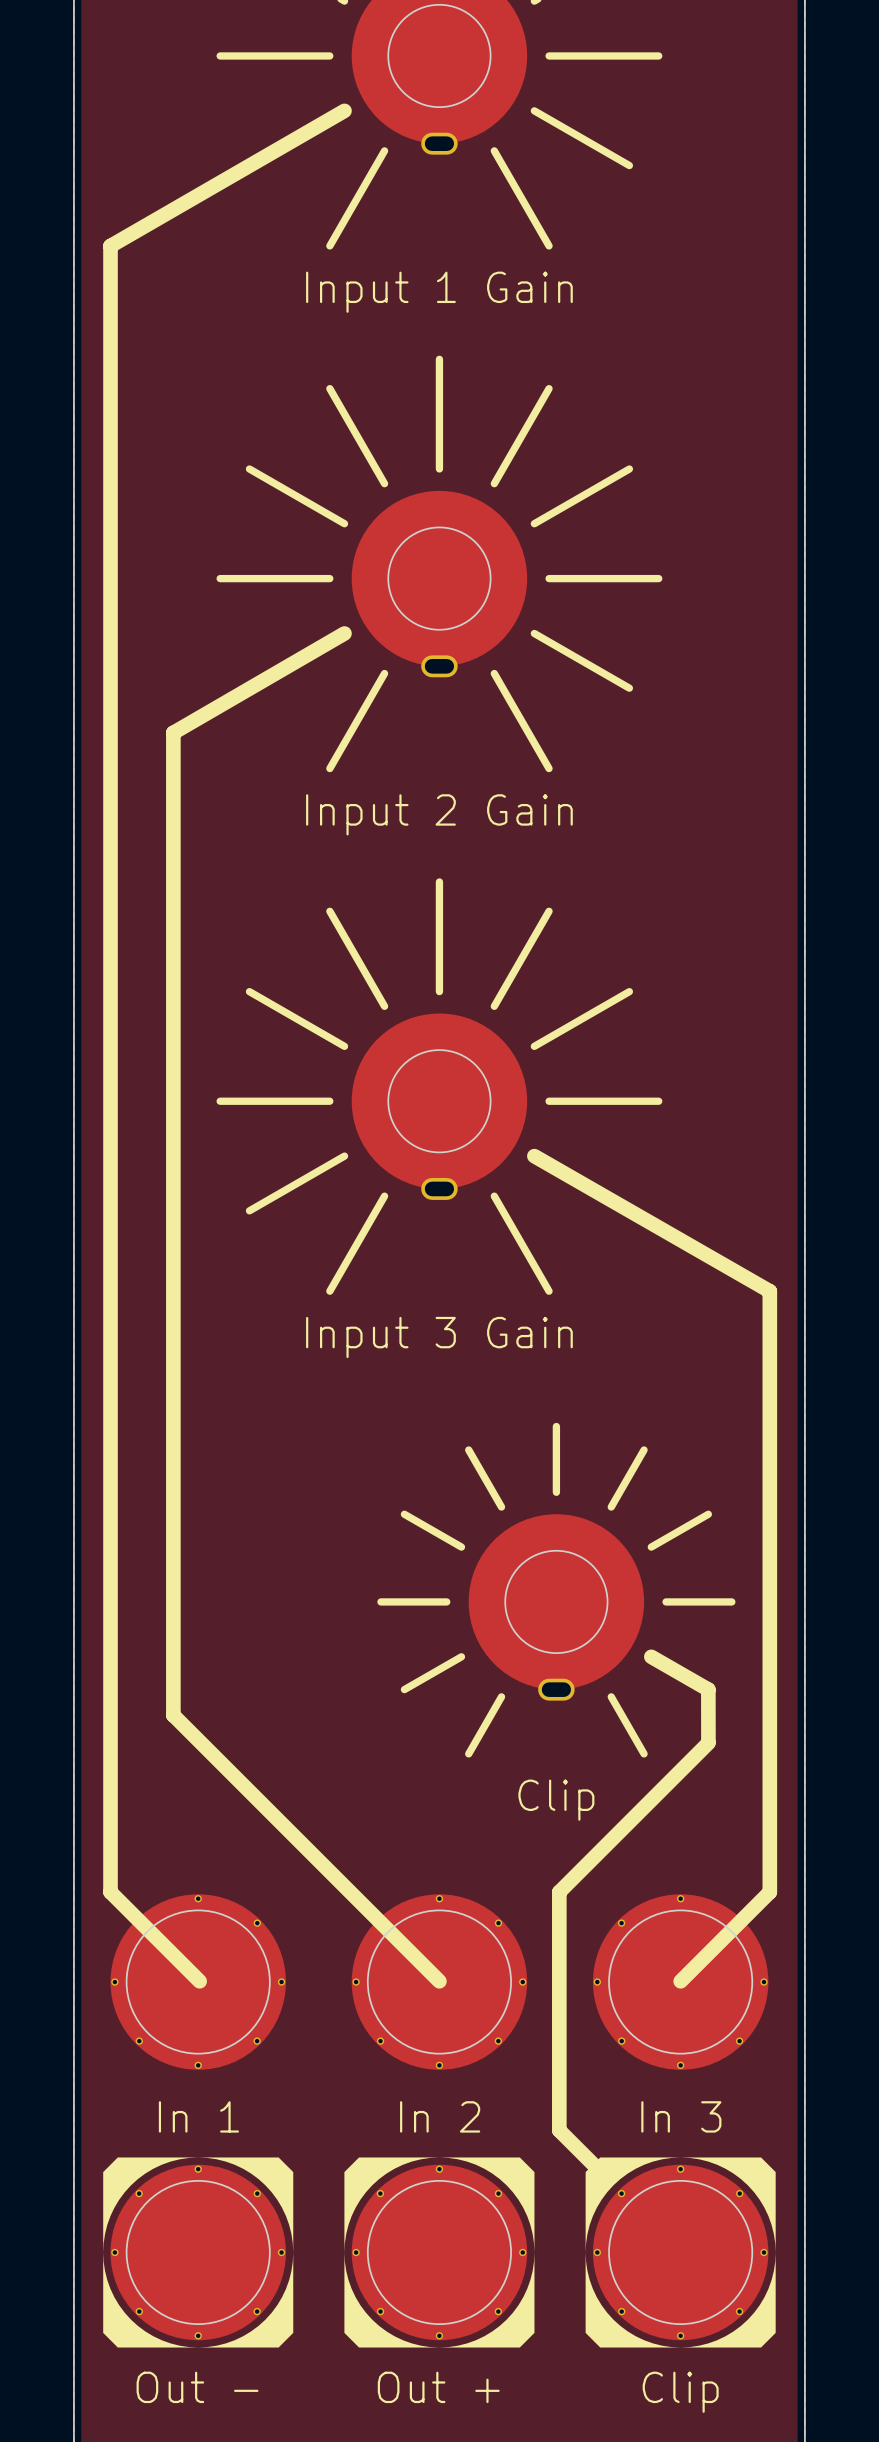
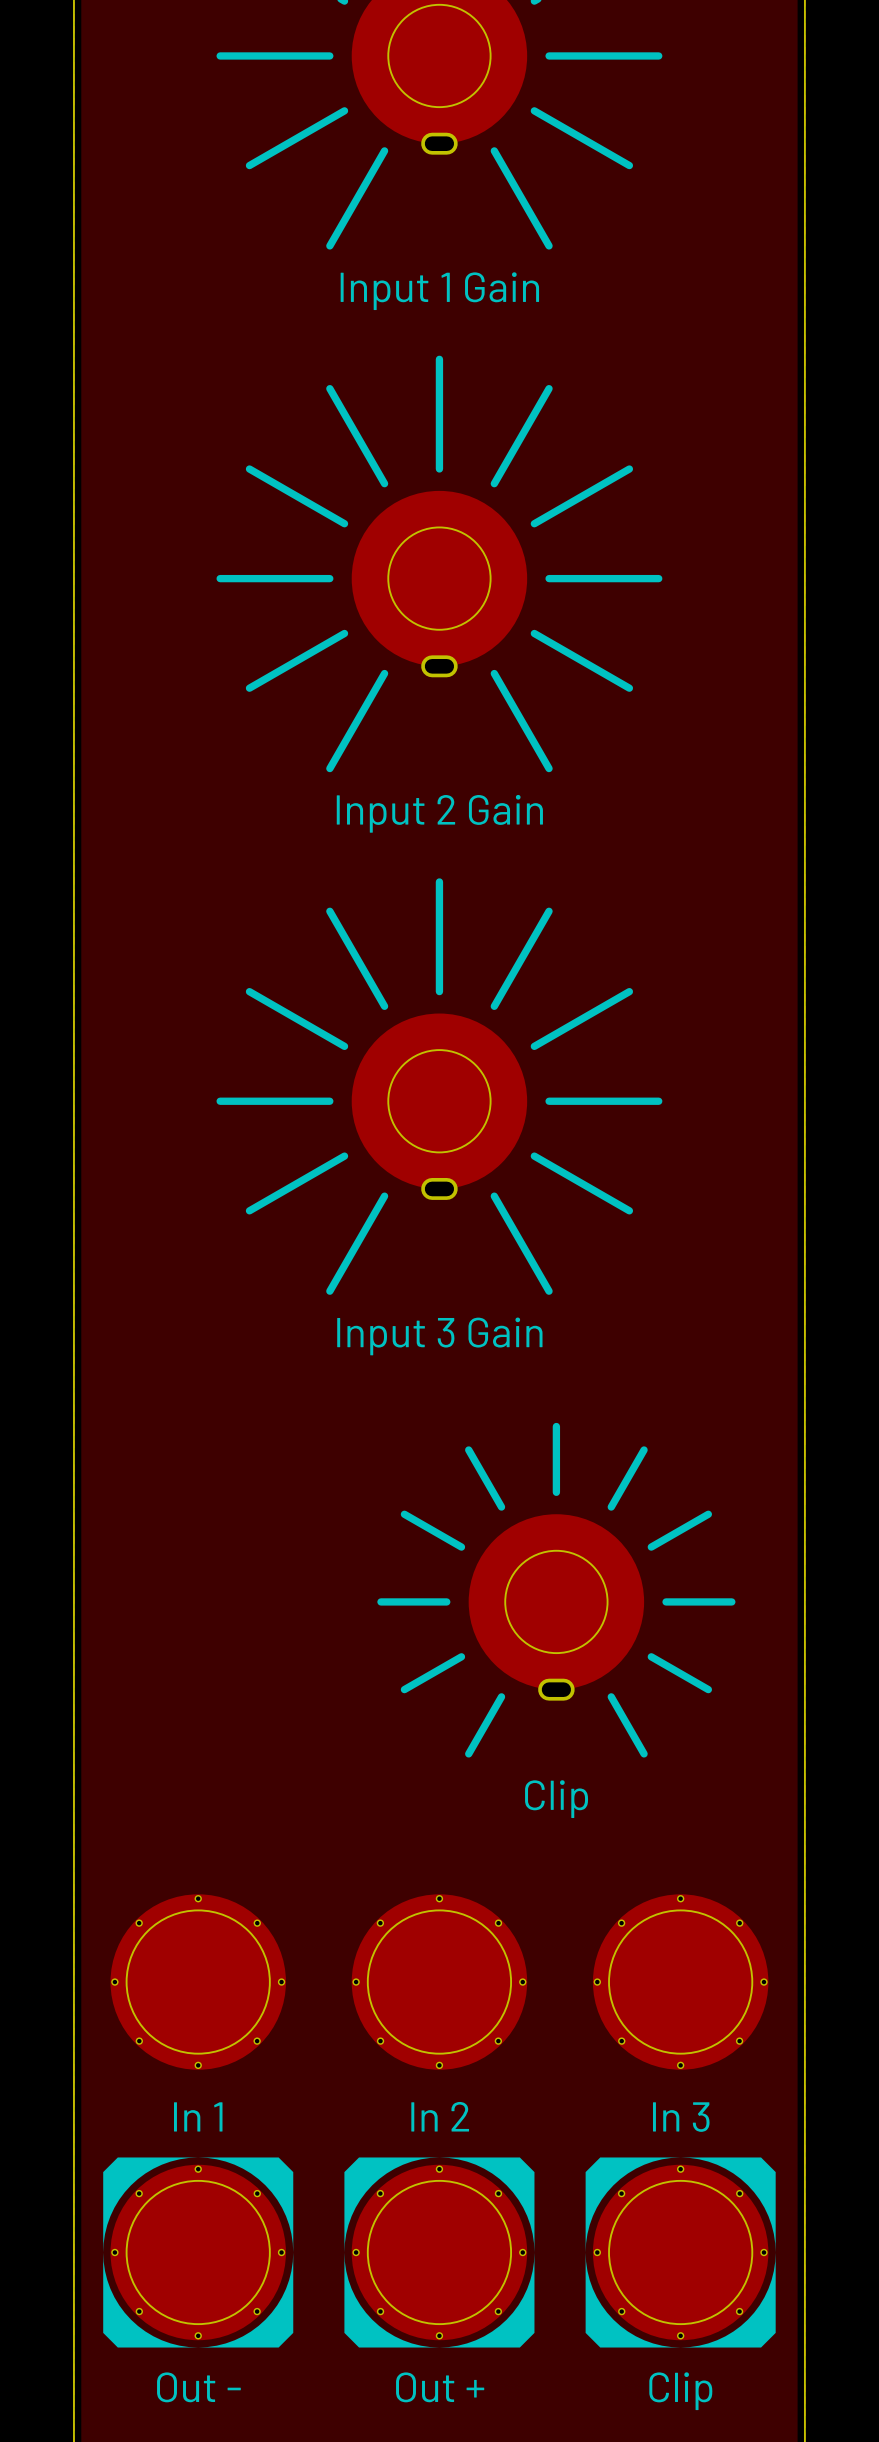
line: (344, 110) (110, 246) (110, 1892) (199, 1981) -> none
line: (344, 633) (173, 732) (173, 1715) (439, 1981) -> none
line: (534, 1156) (769, 1291) (769, 1892) (680, 1981) -> none
line: (651, 1656) (708, 1689) (708, 1742) -> none
line: (708, 1743) (559, 1892) (559, 2130) (594, 2165) -> none

